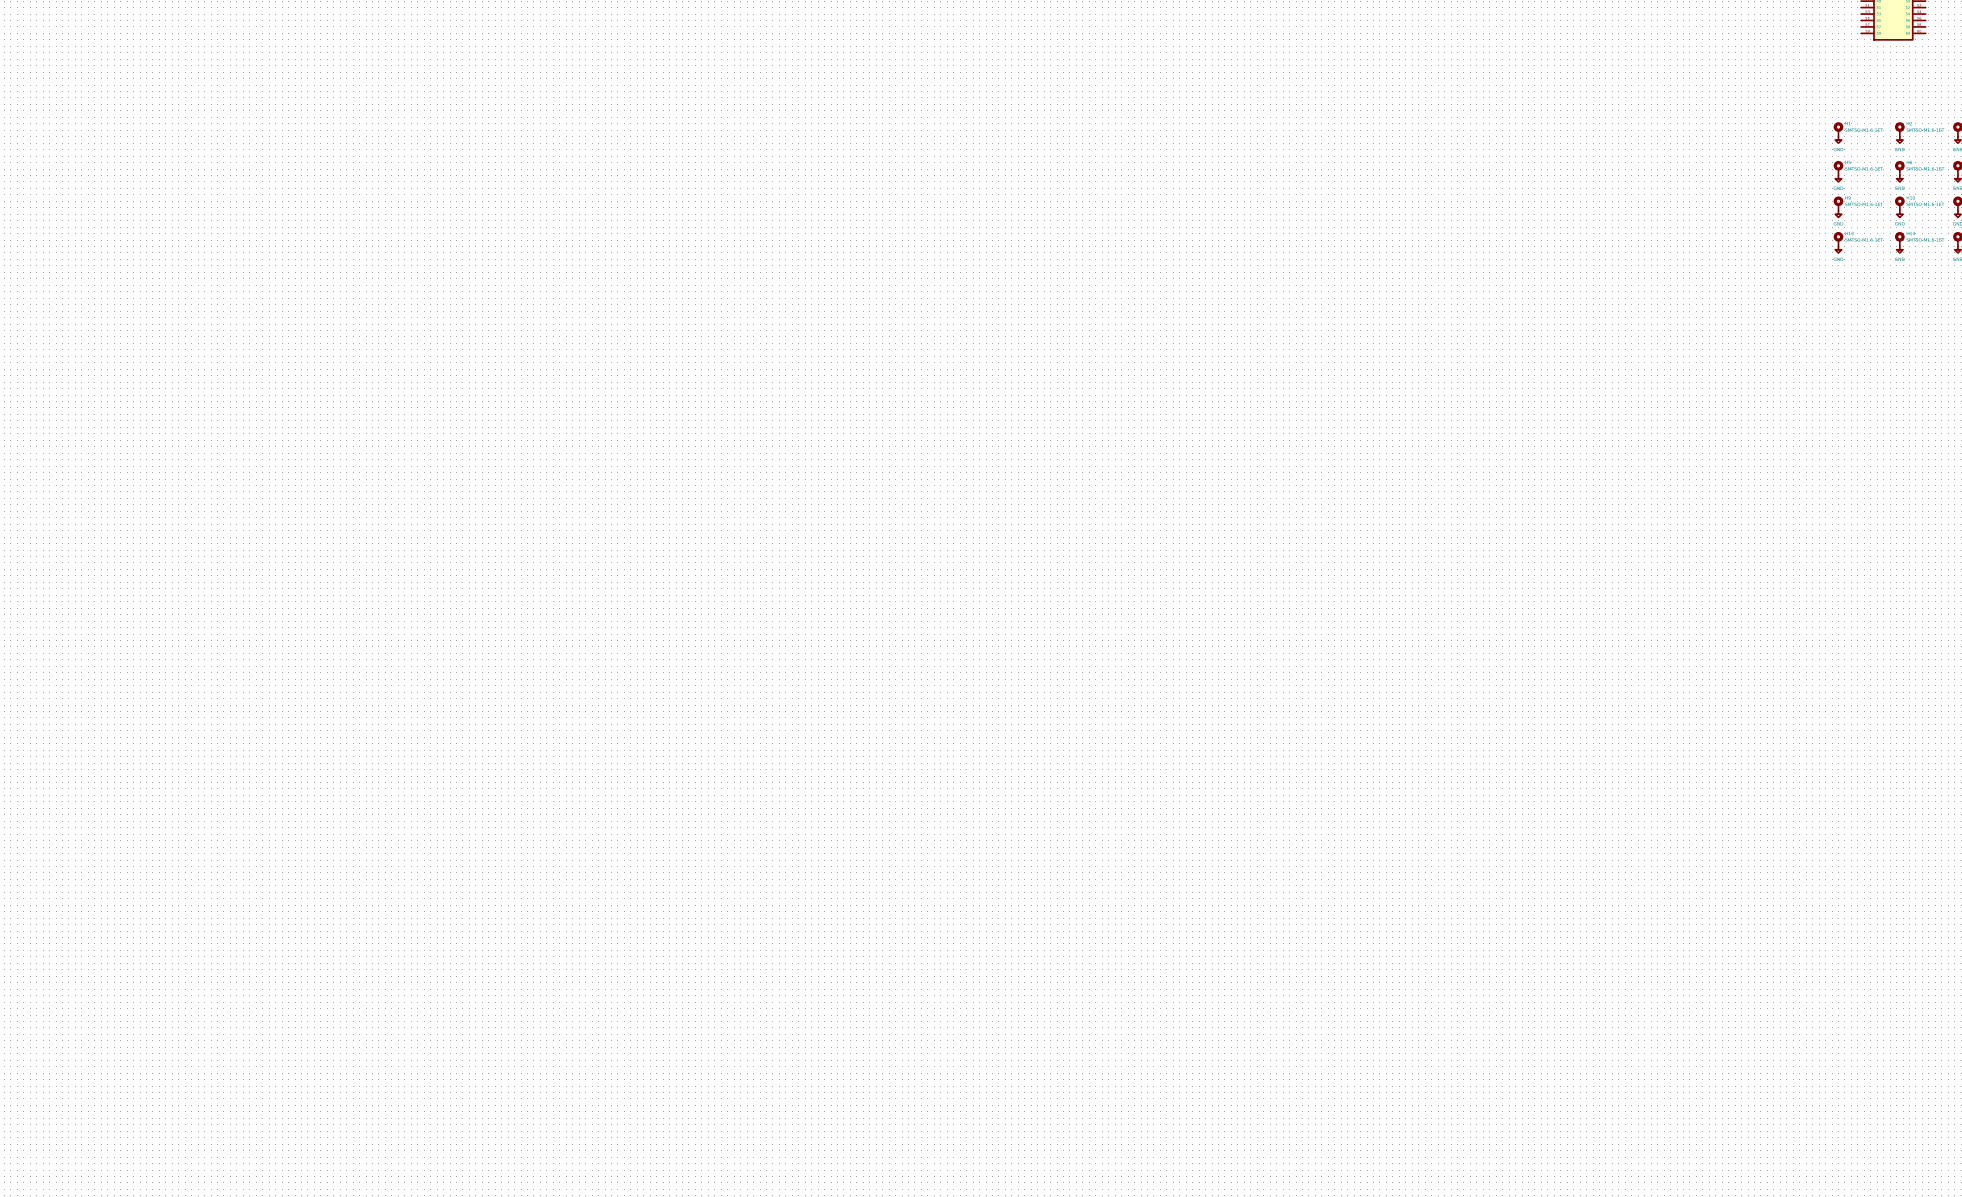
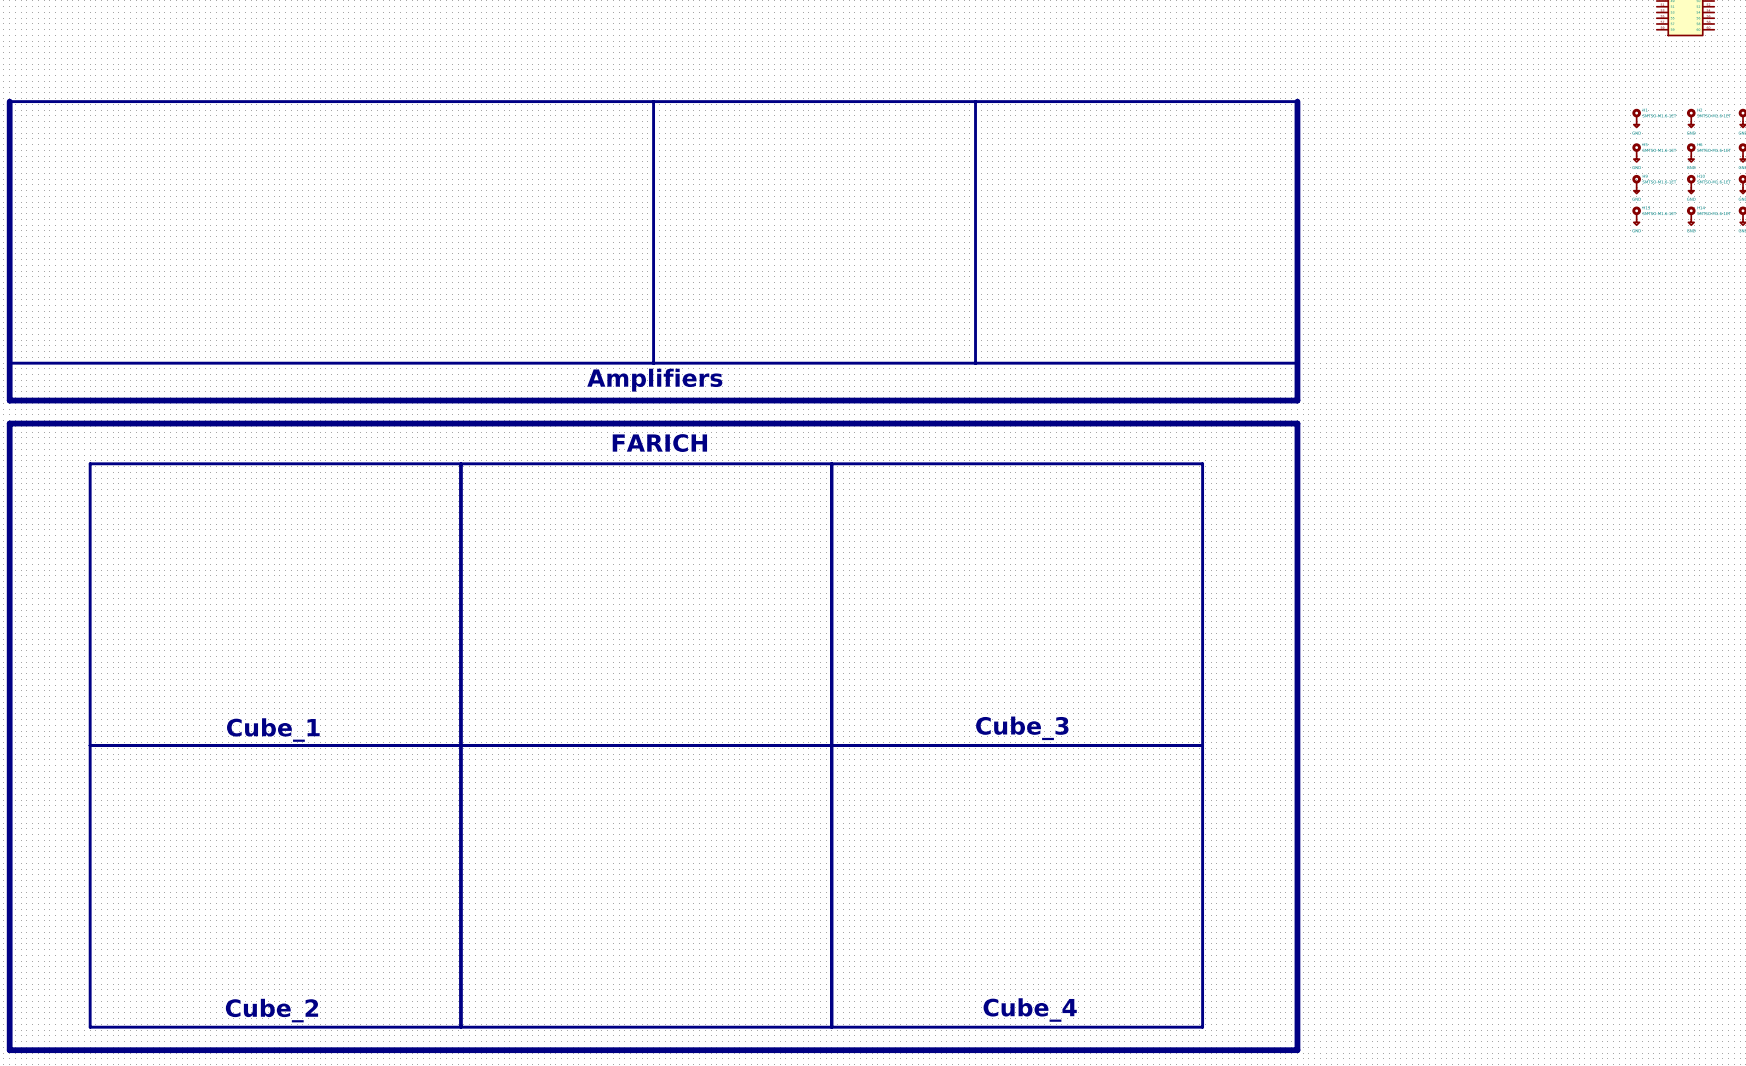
line: none -> (9, 101) (9, 363) (1297, 363) (1297, 101)
line: none -> (9, 101) (1297, 101)
line: none -> (9, 101) (9, 400) (1297, 400) (1297, 101)
line: none -> (653, 101) (653, 363)
line: none -> (975, 101) (975, 363)
text: none -> Amplifiers (654, 380)
line: none -> (9, 423) (1297, 423) (1297, 1050) (9, 1050) (9, 423)
text: none -> FARICH (659, 443)
line: none -> (90, 463) (1202, 463) (1202, 1027) (90, 1027) (90, 463)
line: none -> (460, 463) (460, 1027)
line: none -> (831, 463) (831, 1027)
text: none -> Cube_3 (1022, 728)
text: none -> Cube_1 (273, 730)
line: none -> (90, 745) (1202, 745)
text: none -> Cube_4 (1030, 1010)
text: none -> Cube_2 (271, 1010)

